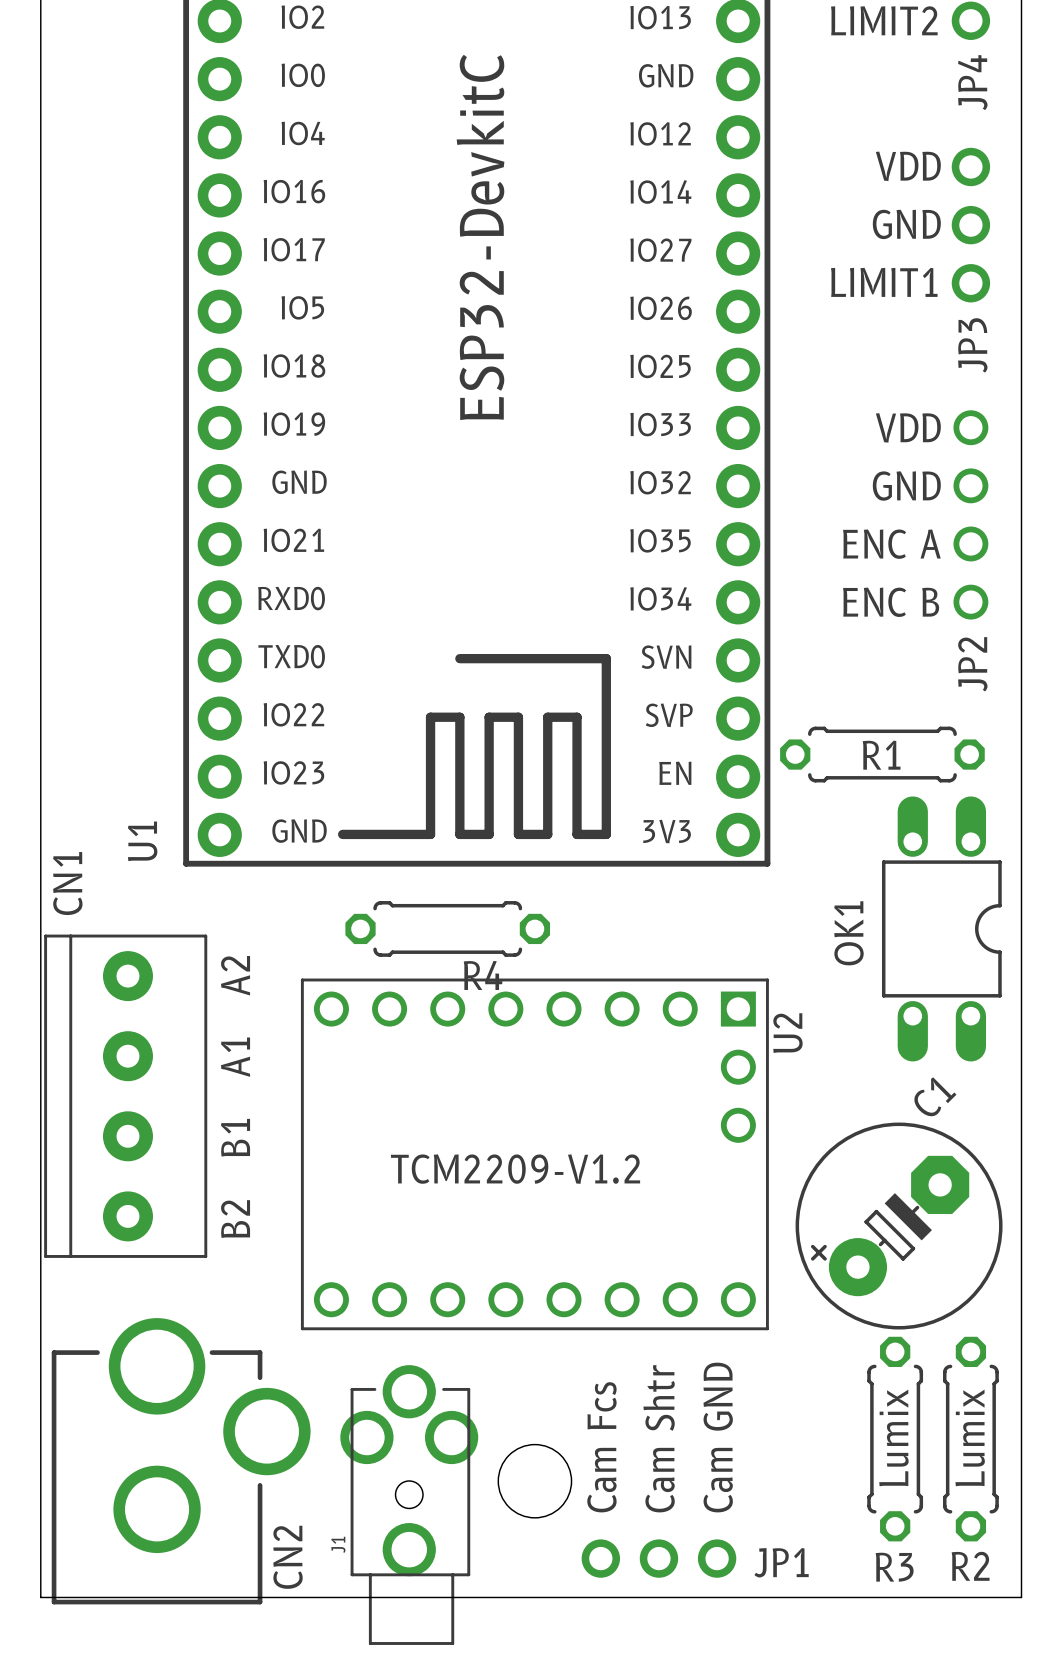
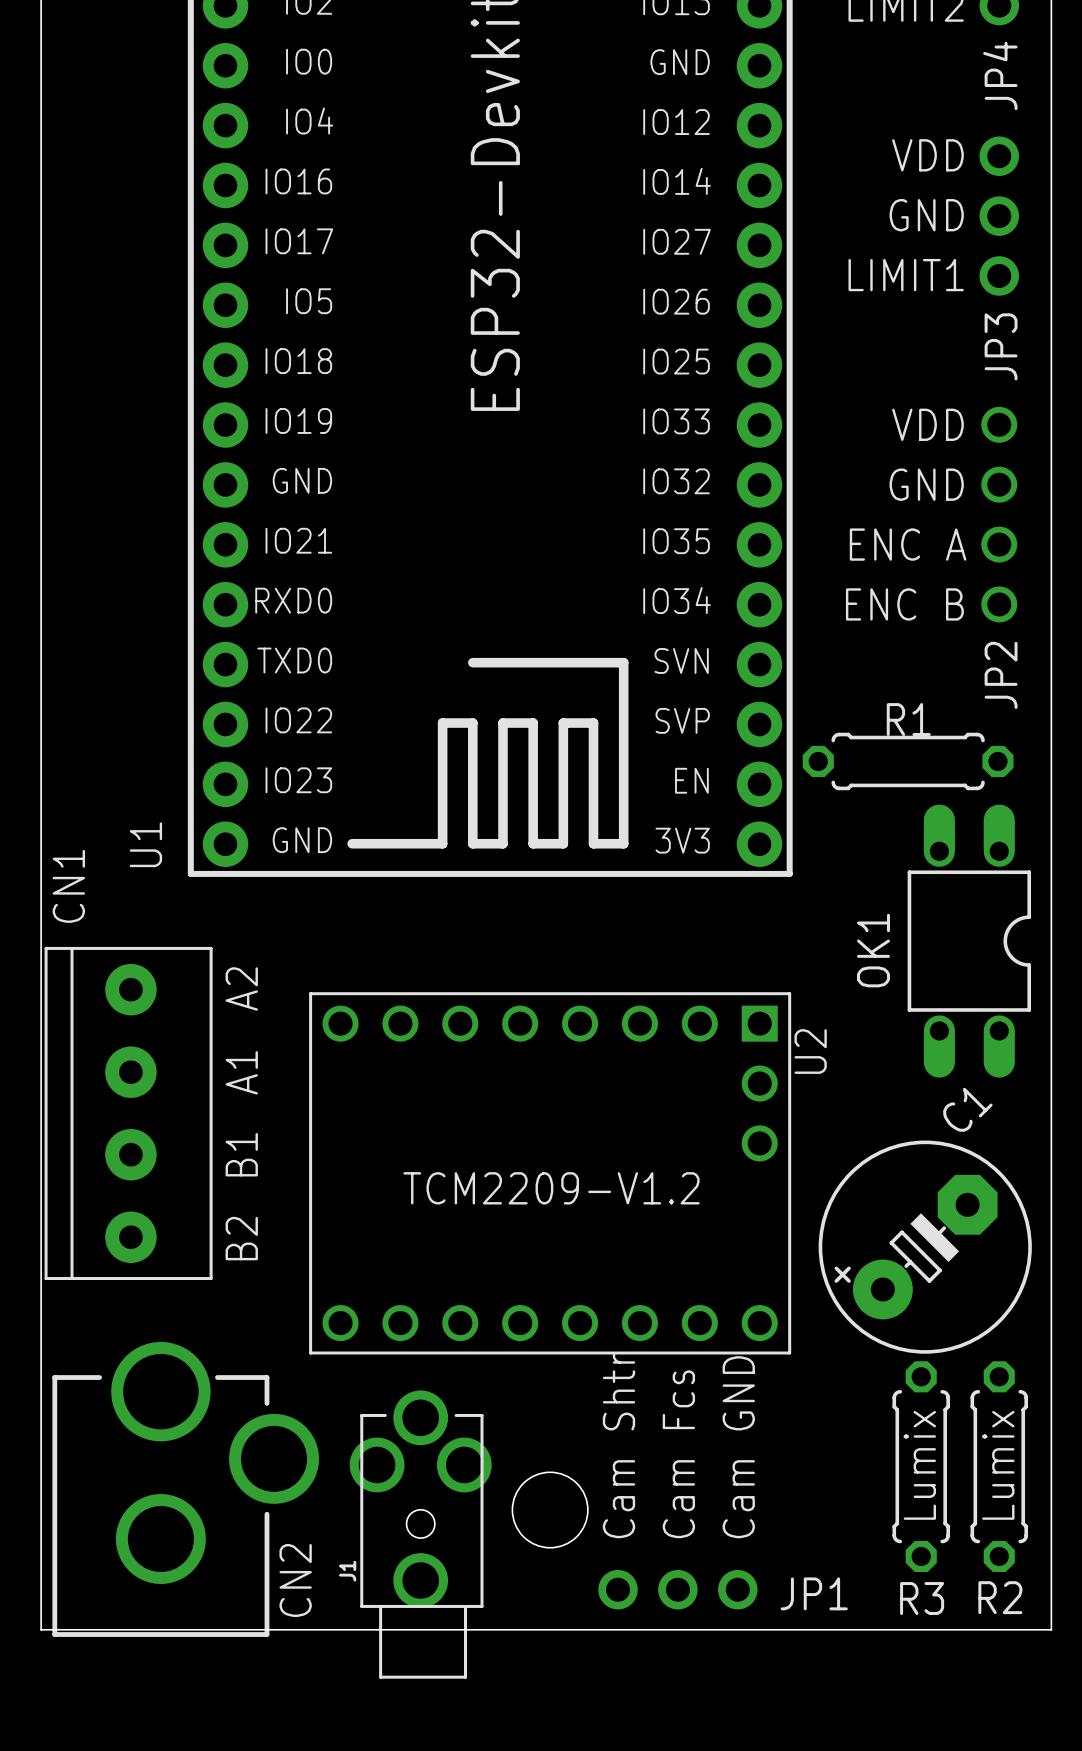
R1 name position: R1 (881, 755) -> R1 (908, 719)
R4: (447, 928) -> none
text: Cam Shtr (659, 1438) -> Cam Fcs (678, 1454)
text: Cam Fcs (601, 1447) -> Cam Shtr (618, 1445)

